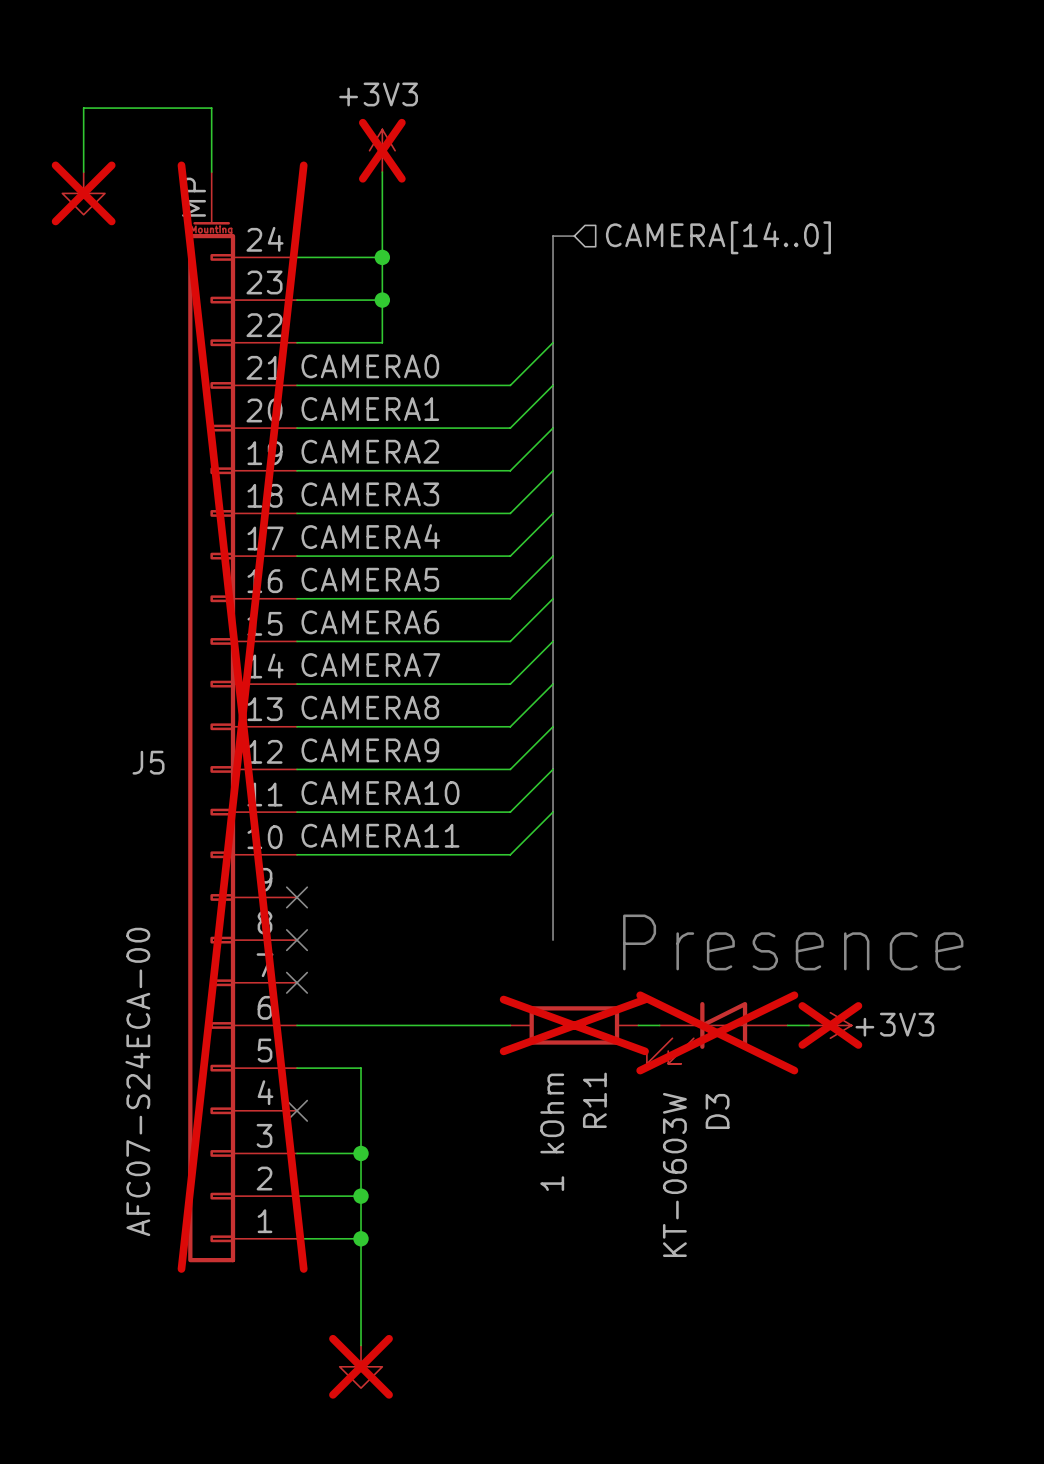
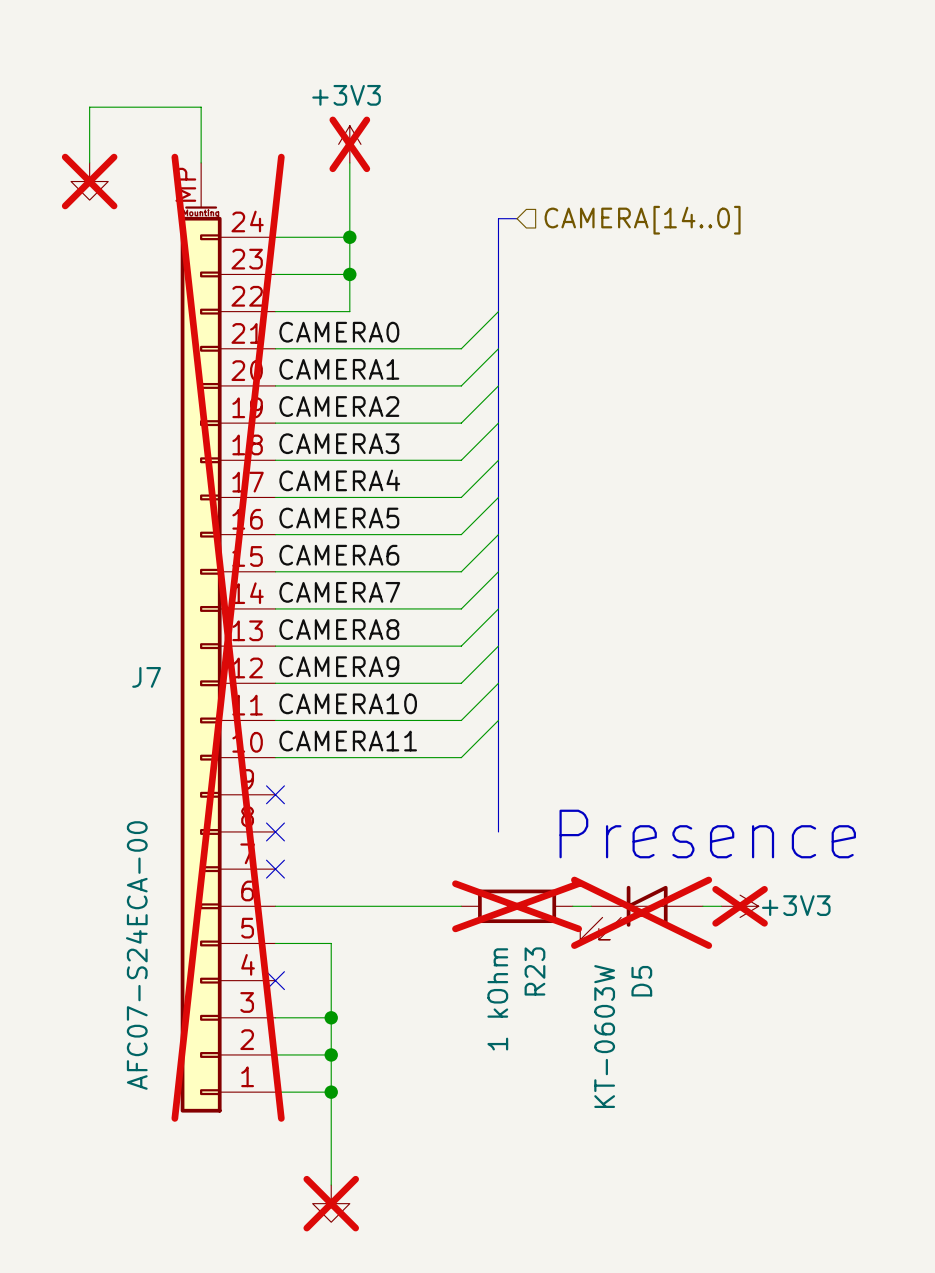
J5 name: J5 (148, 762) -> J7 (146, 677)
R11 name: R11 (594, 1100) -> R23 (534, 971)
D3 name: D3 (717, 1111) -> D5 (641, 981)

